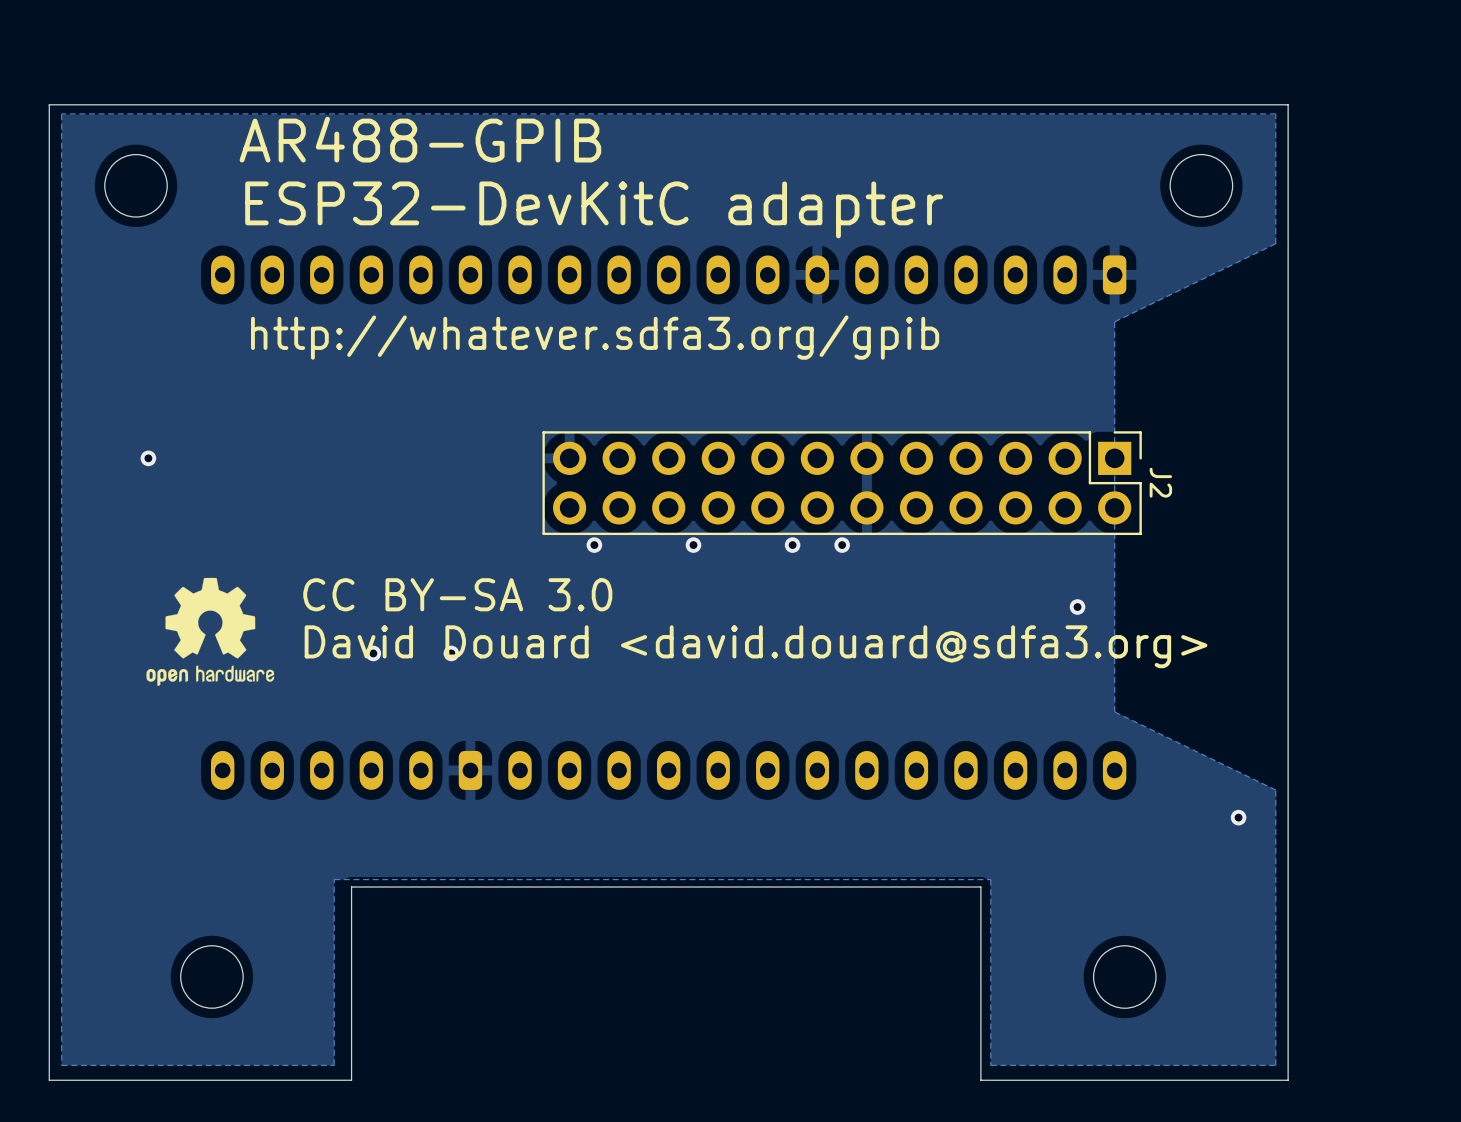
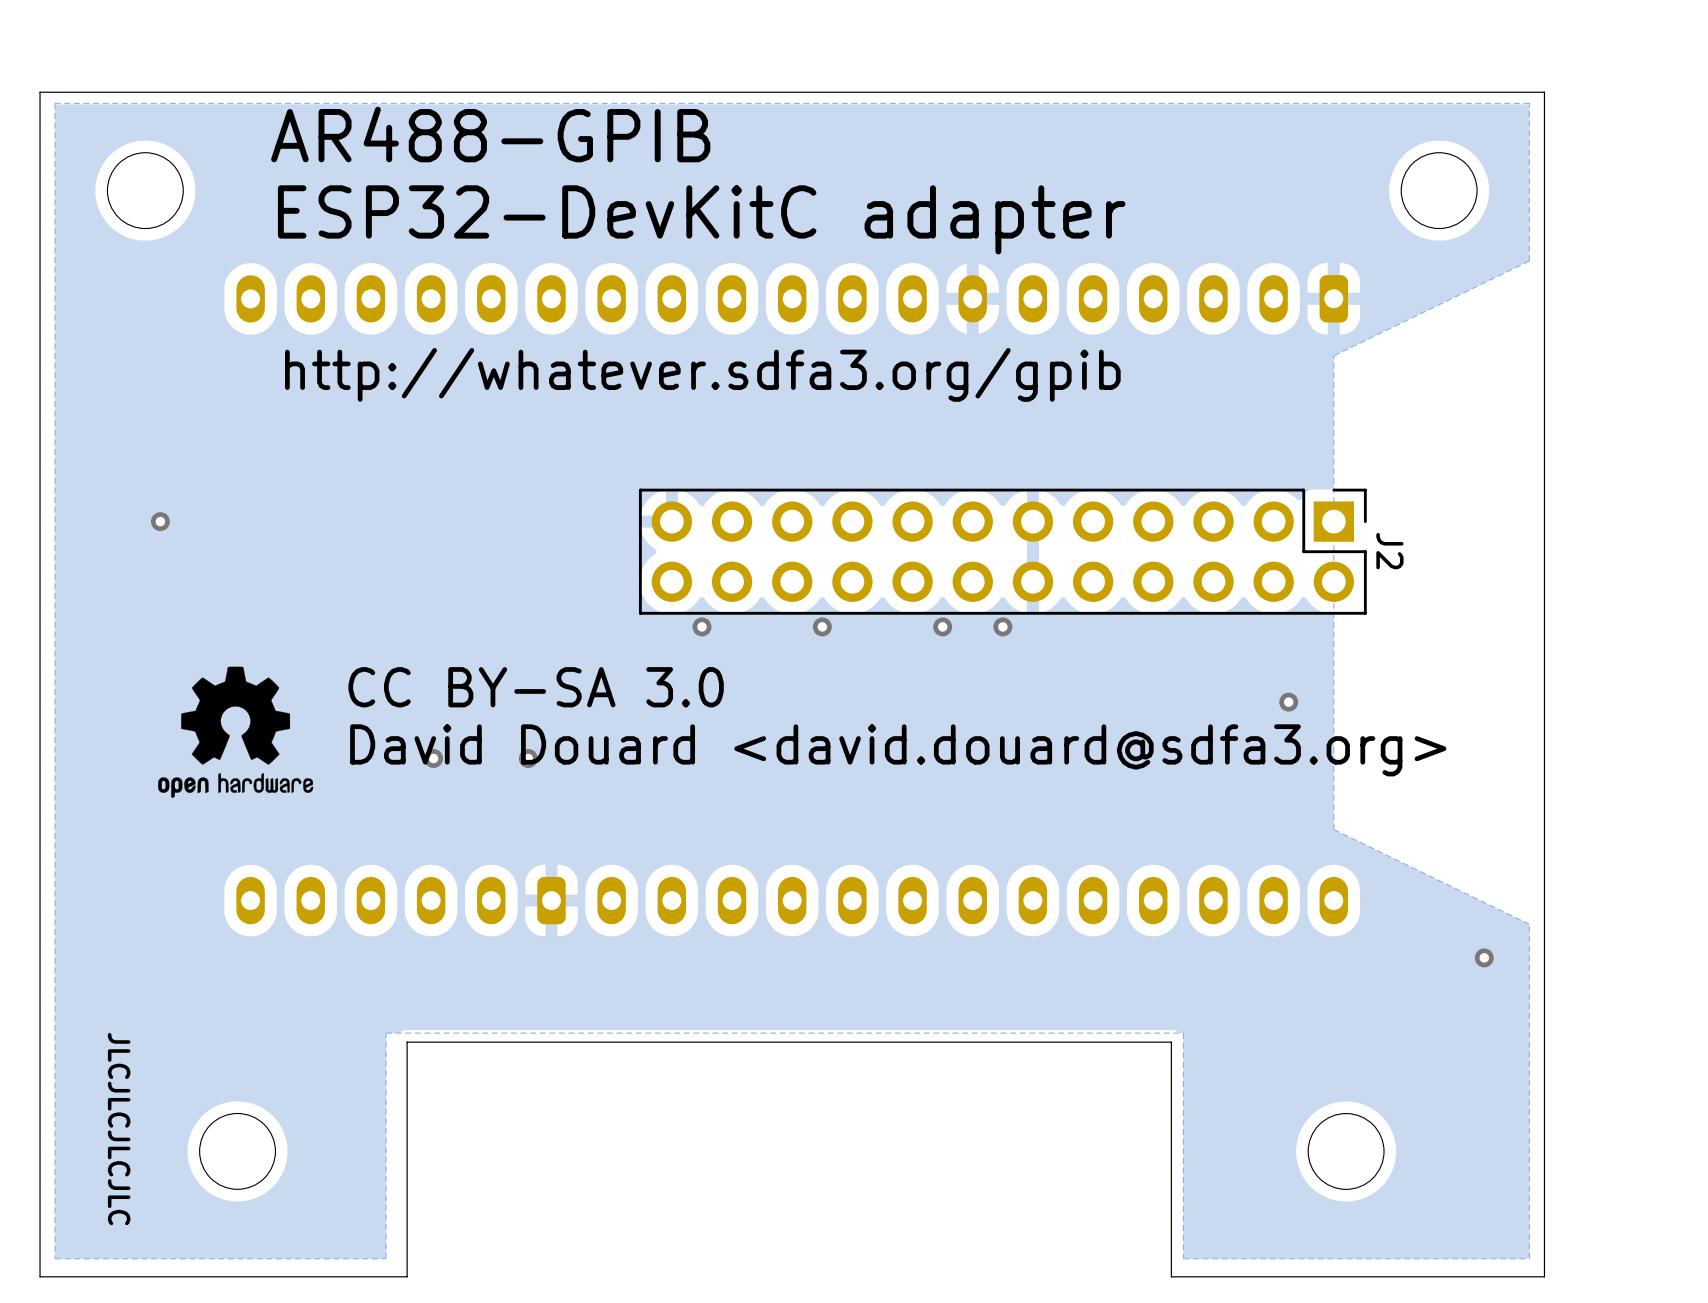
drawing: none -> [107, 1032, 131, 1226]

